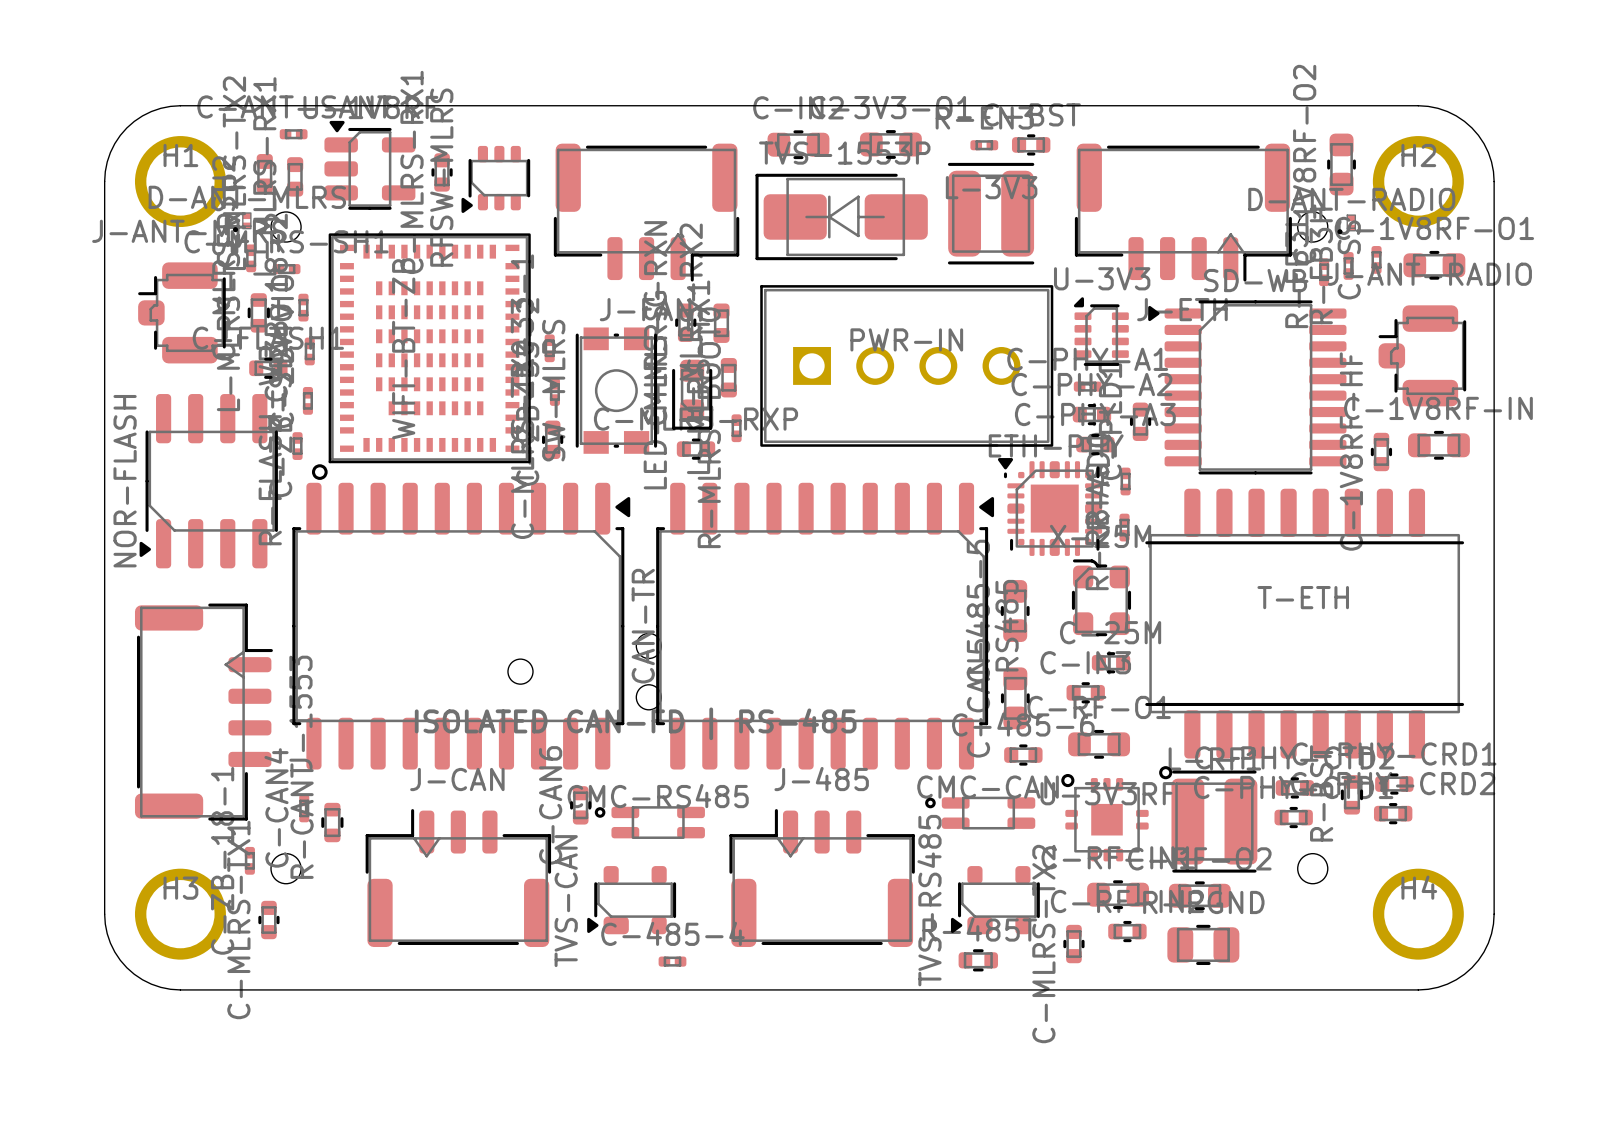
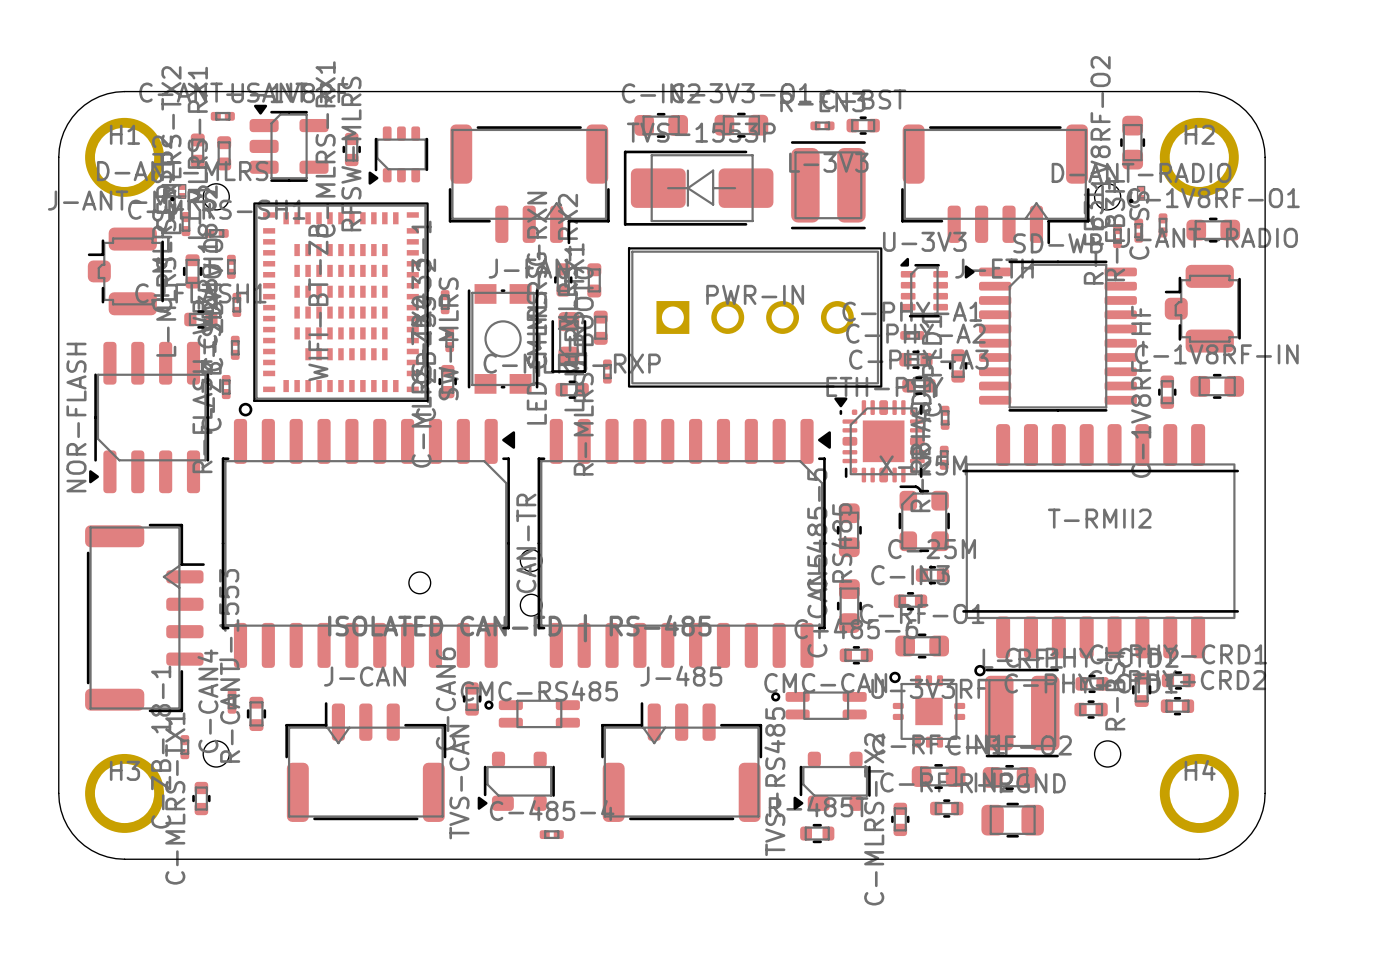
T-ETH name: T-ETH (1303, 597) -> T-RMII2 (1099, 518)

